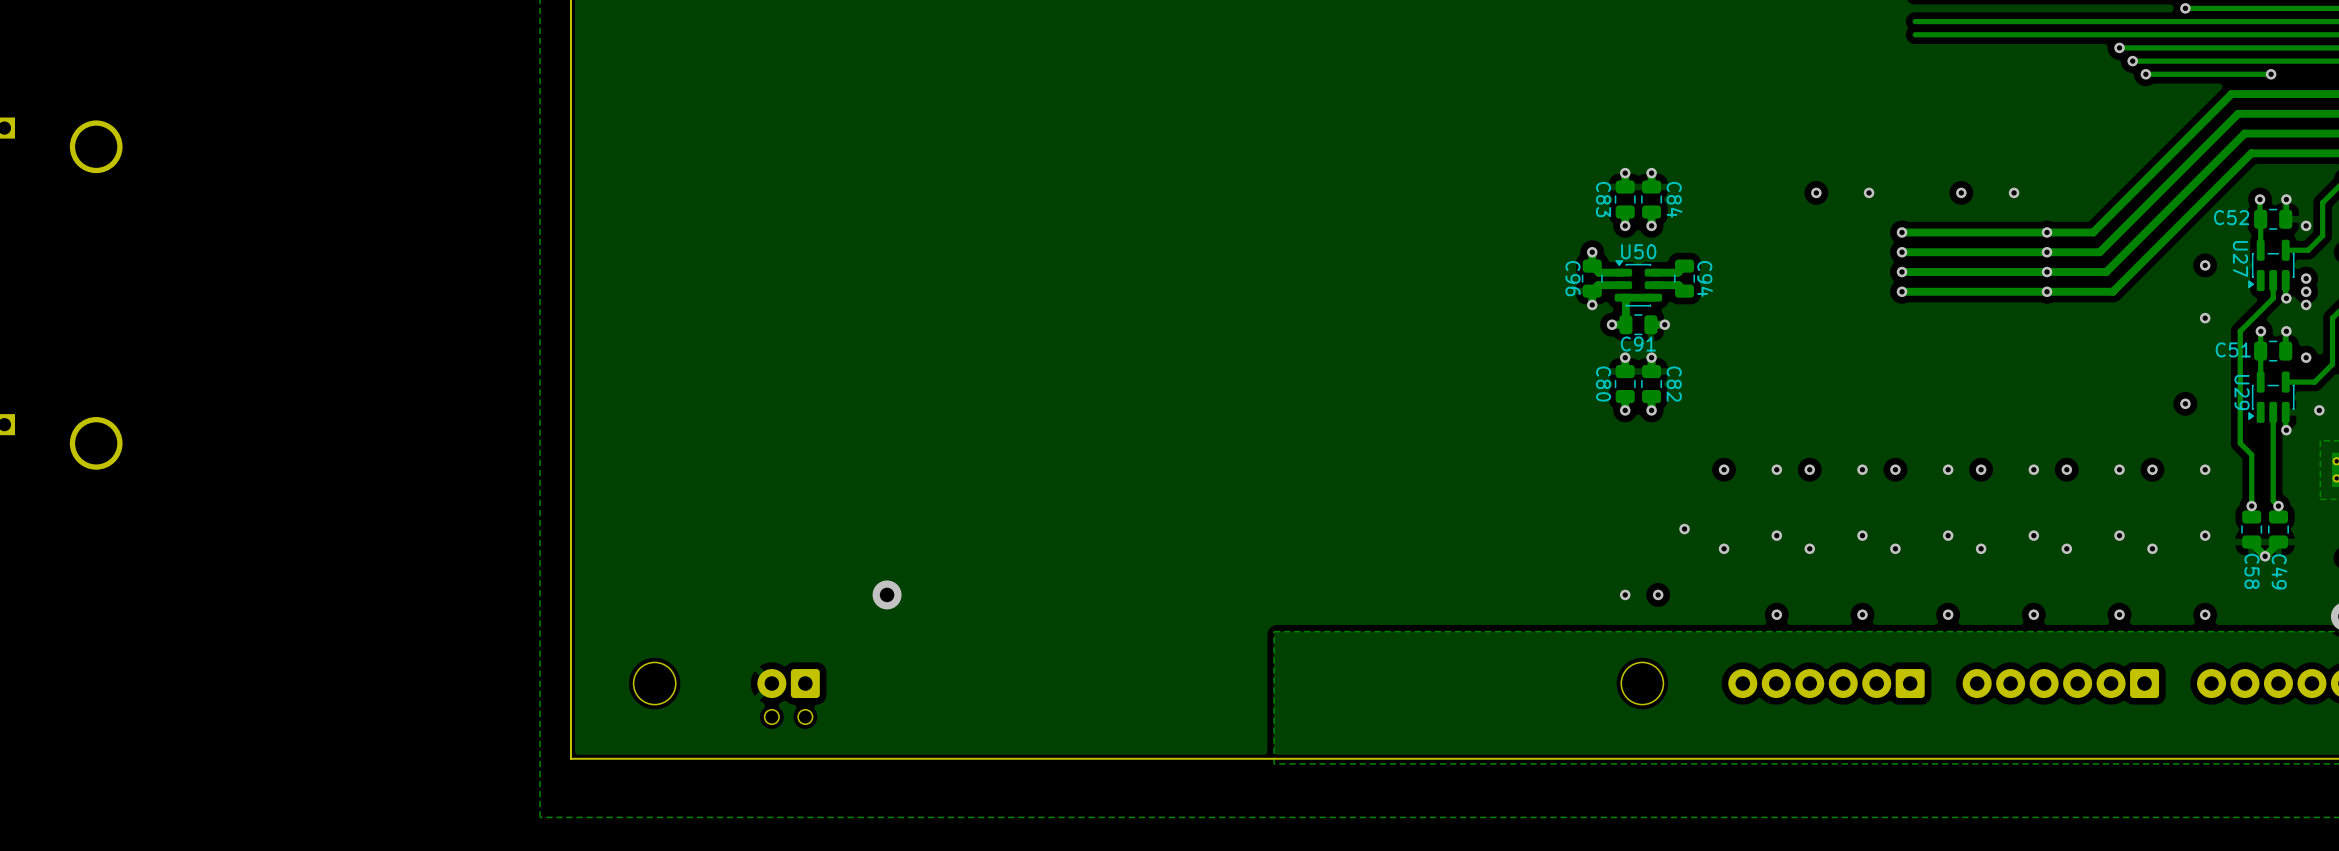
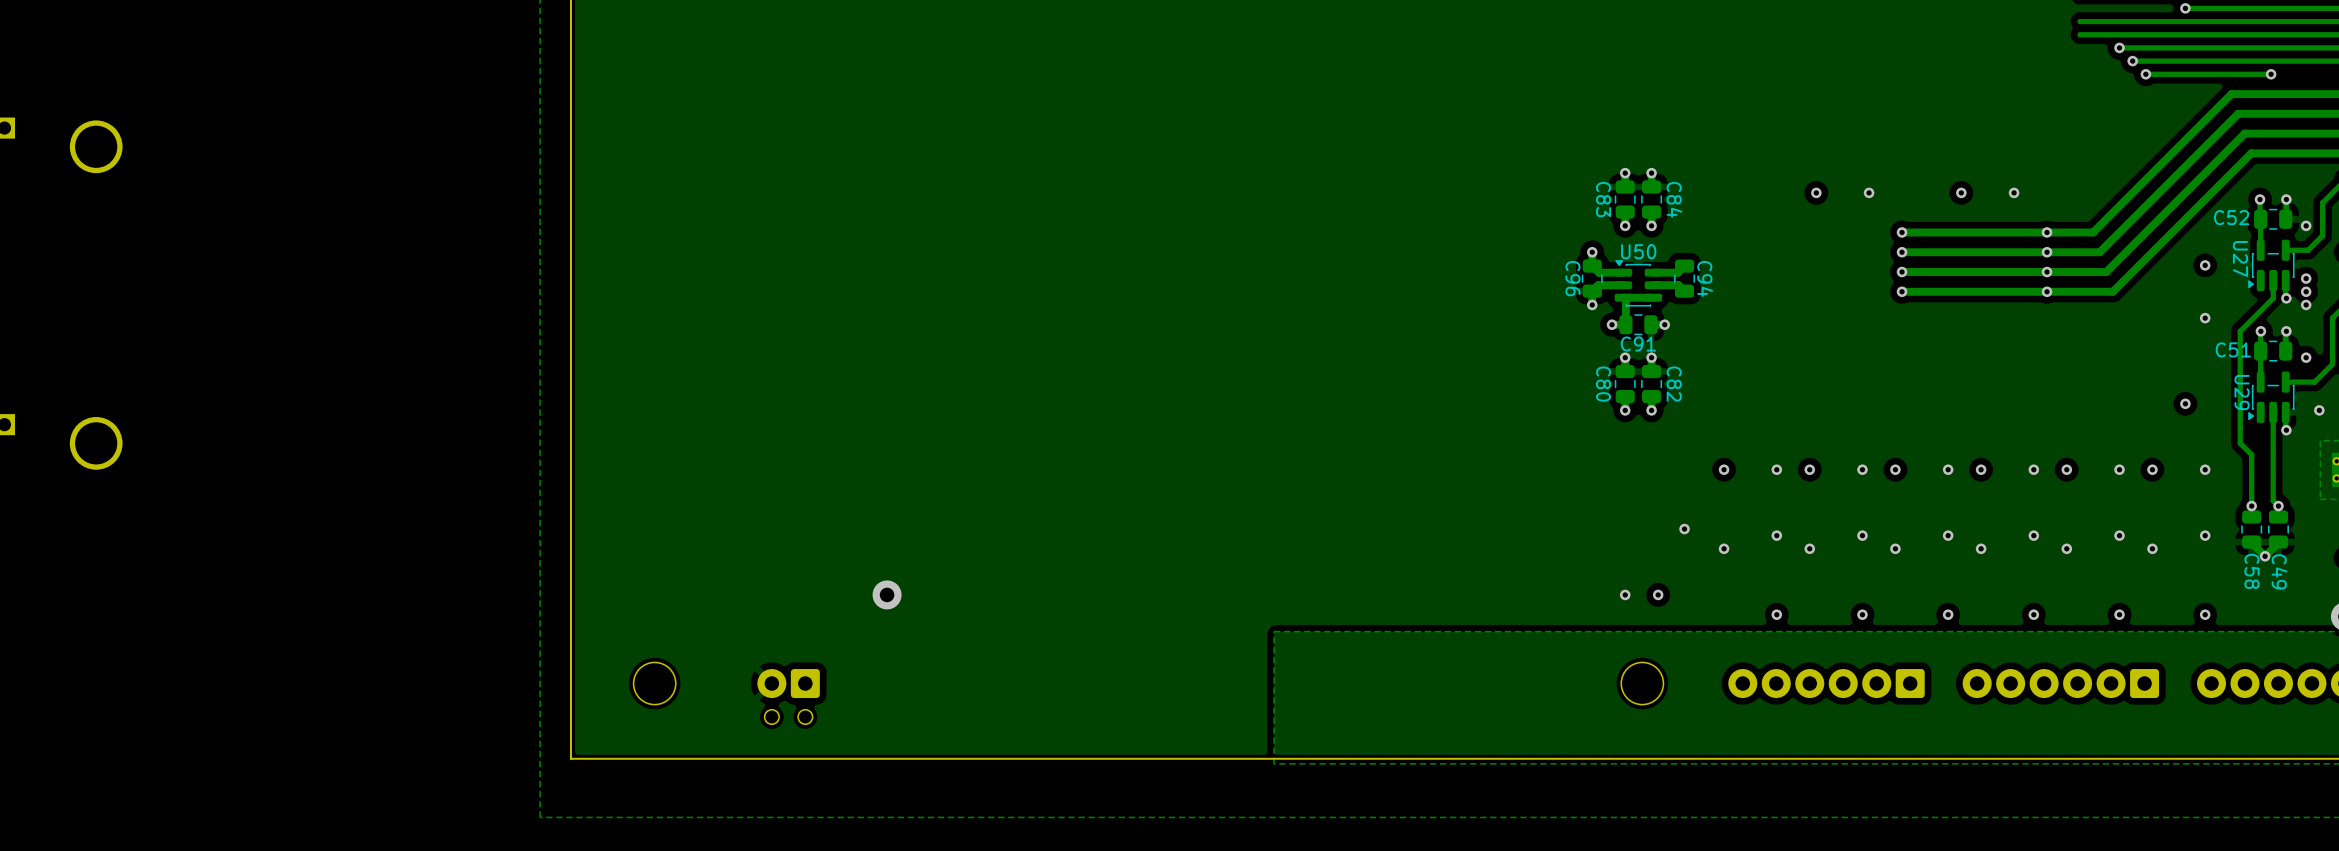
track: (2079, 21) (1915, 21) -> none
track: (2079, 34) (1915, 34) -> none

